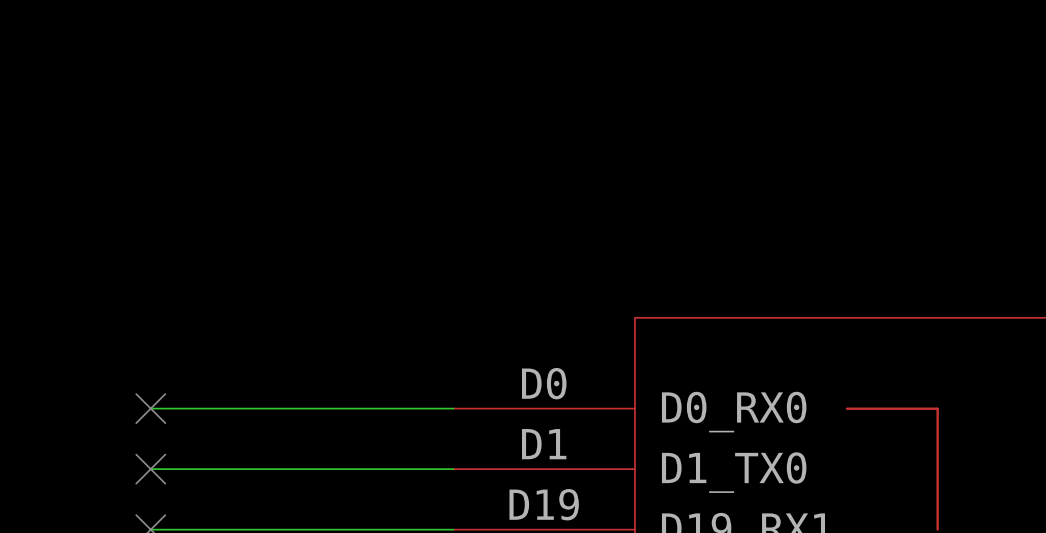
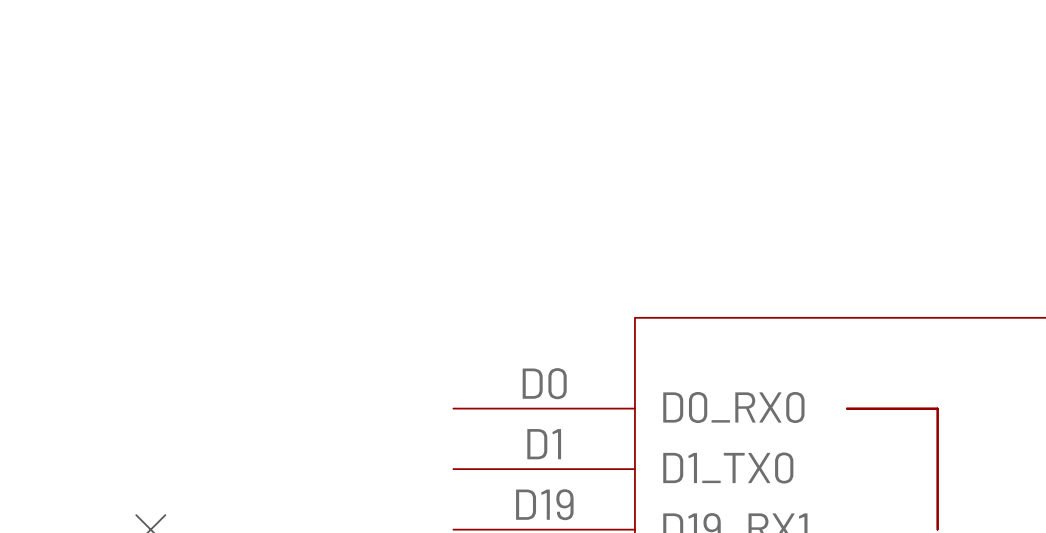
wire: (150, 408) (453, 408) -> none
no-connect mark: (150, 408) -> none
wire: (150, 469) (453, 469) -> none
no-connect mark: (150, 469) -> none
wire: (150, 529) (453, 529) -> none

